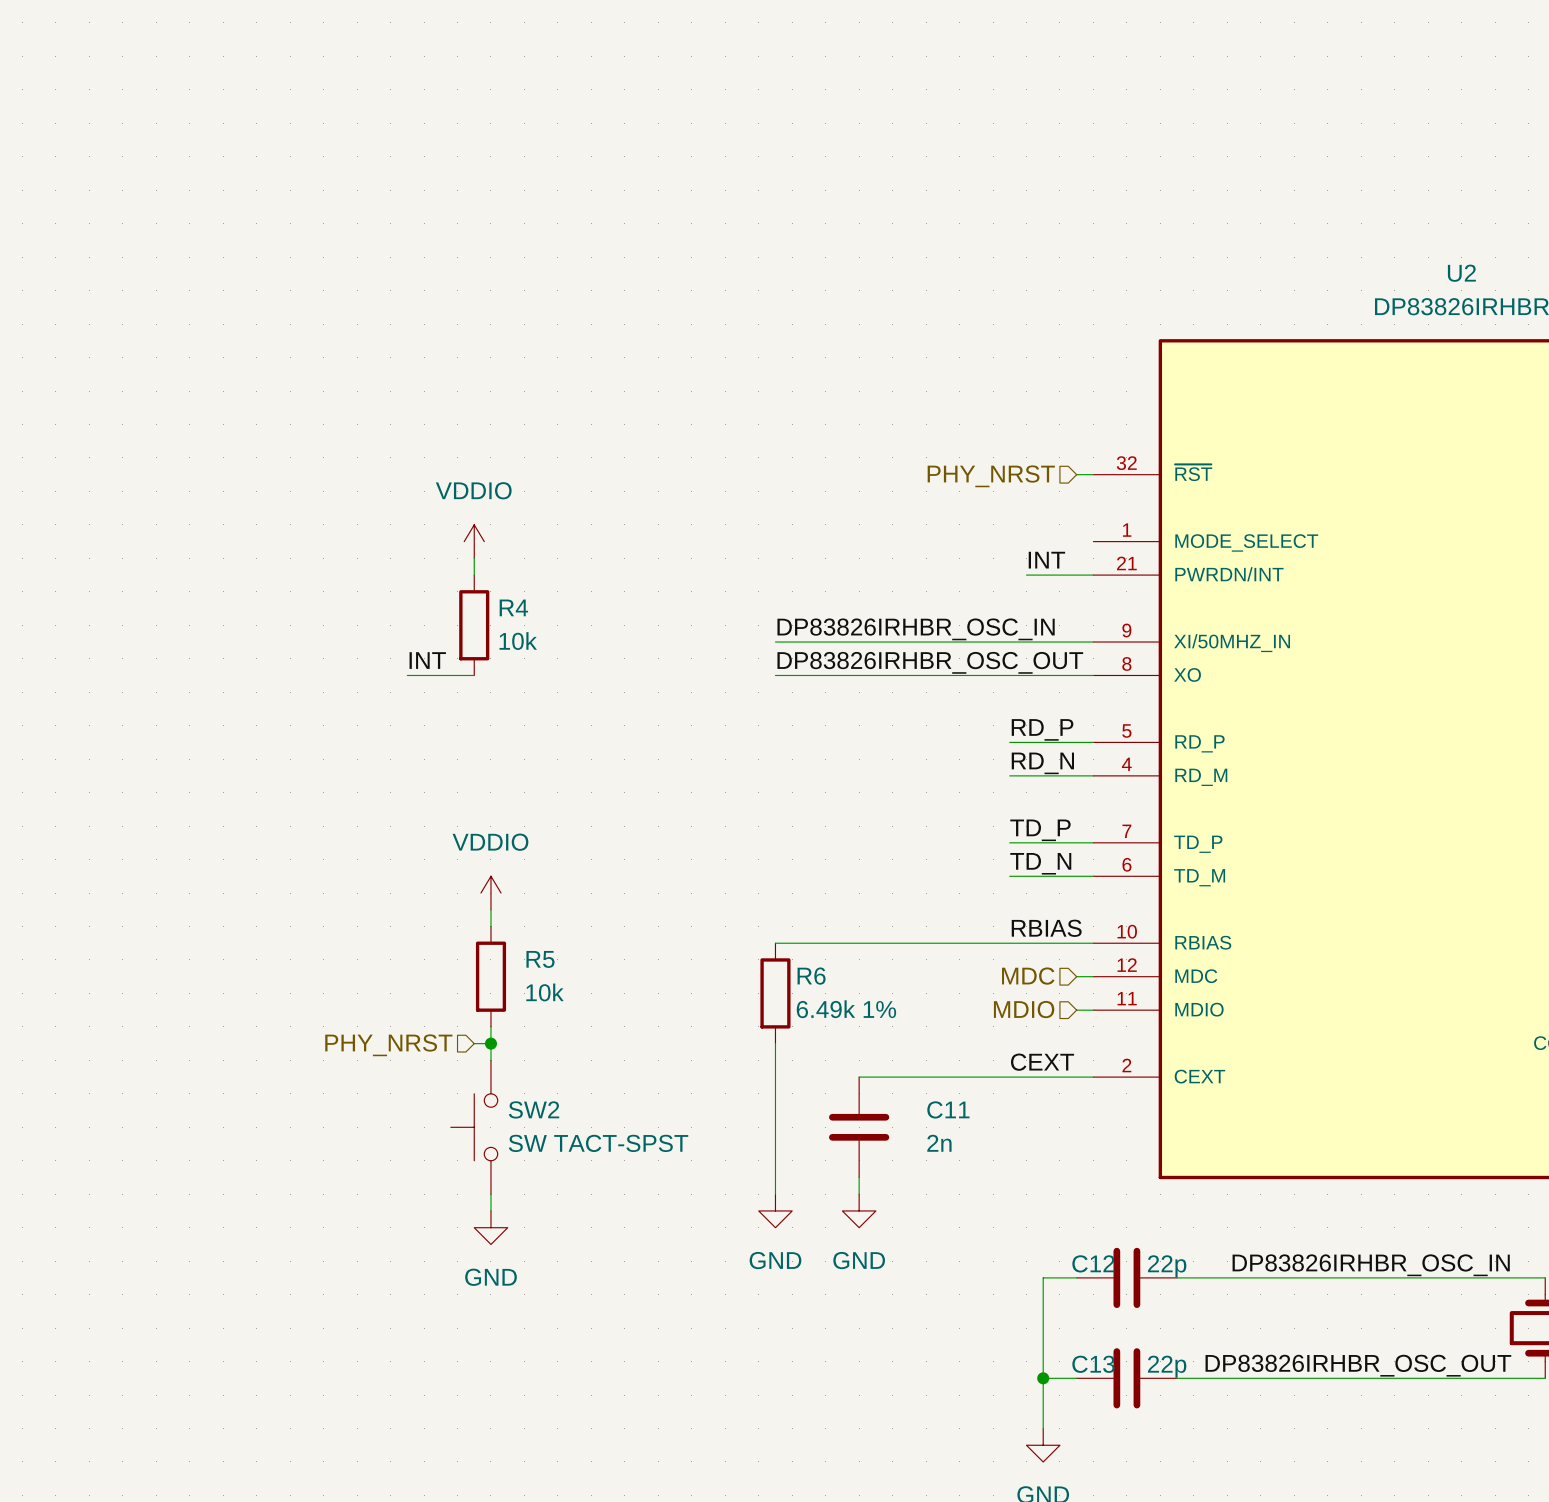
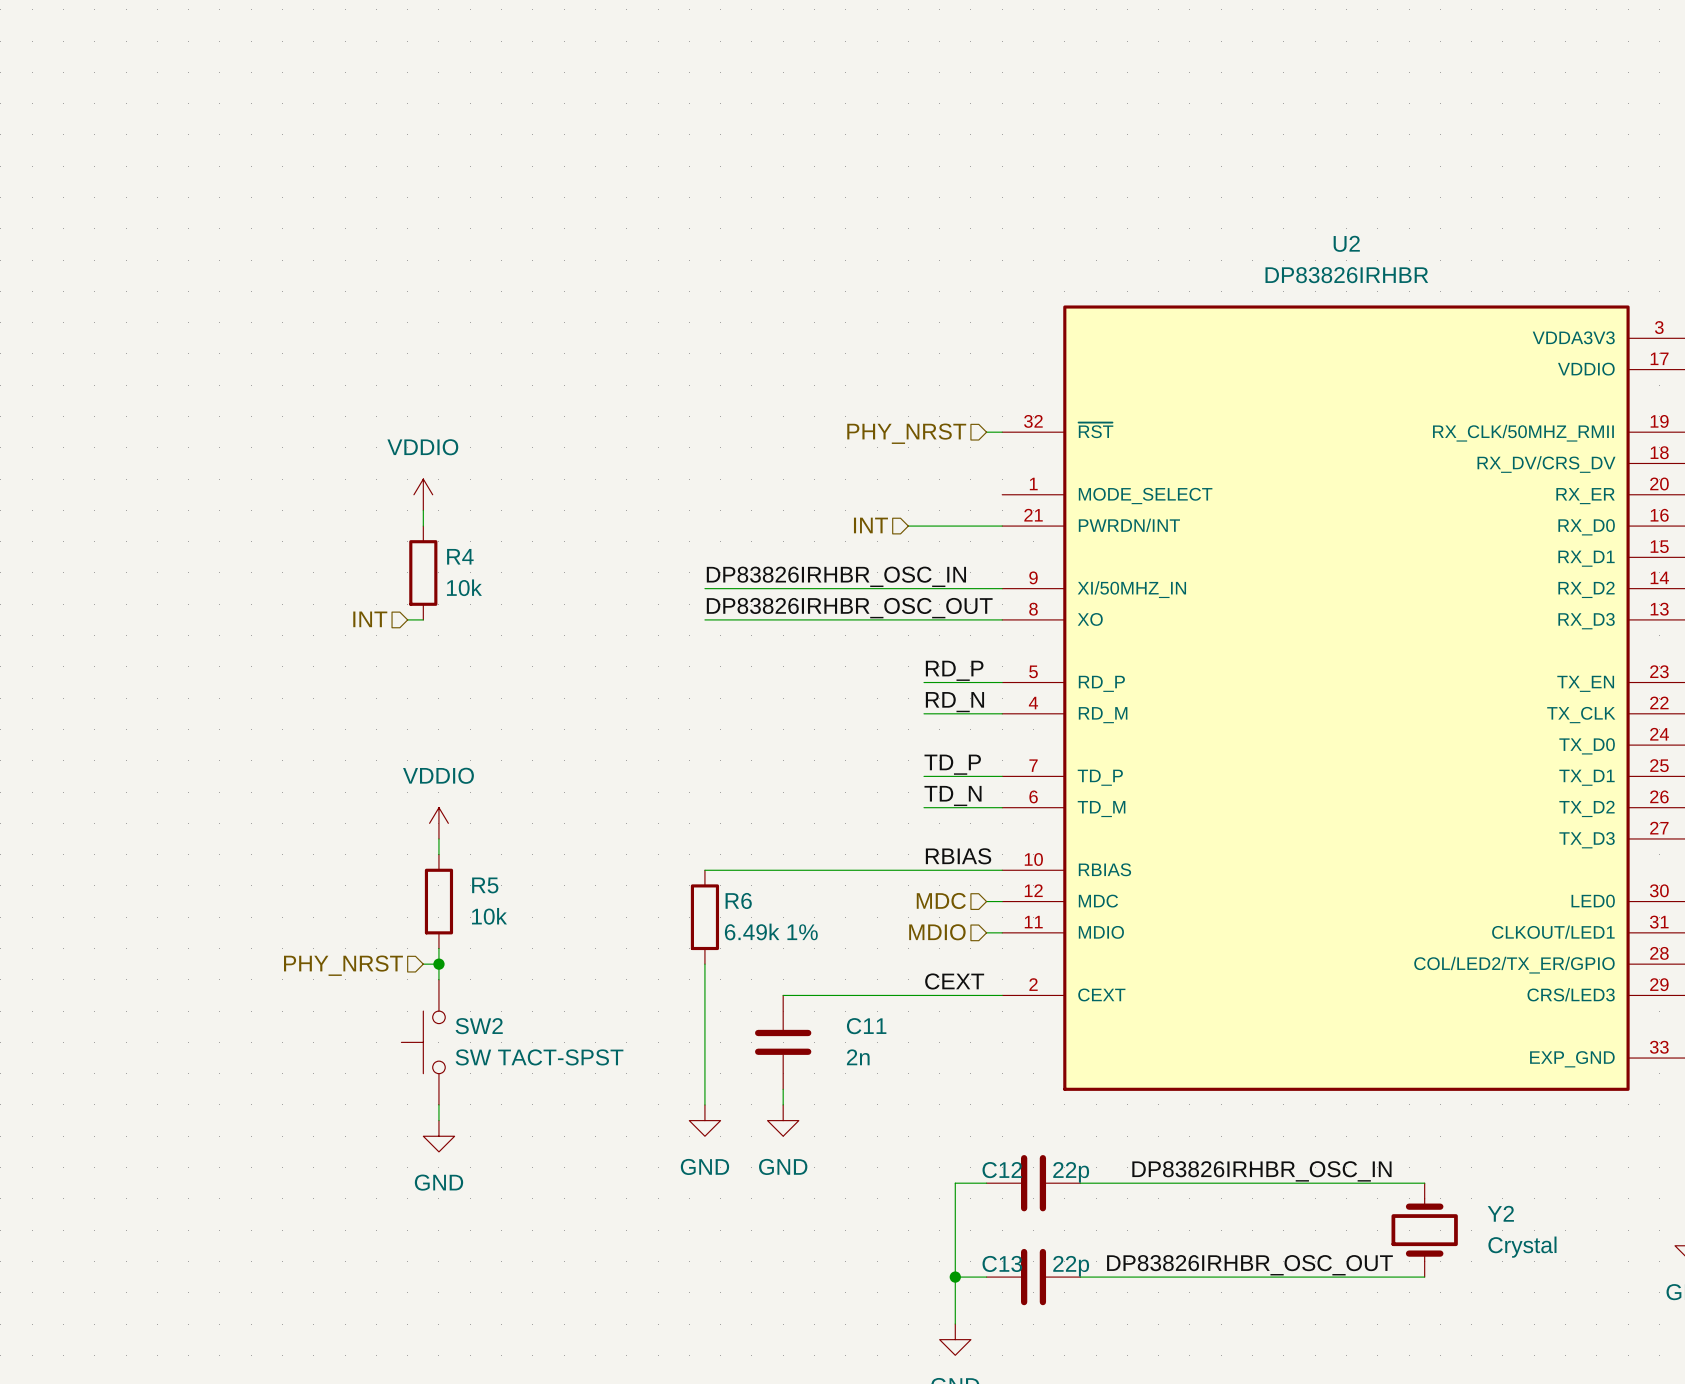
label: INT (1046, 560) -> none
hierarchical label: none -> INT (870, 525)
wire: none -> (908, 526) (939, 526)
label: INT (427, 660) -> none
hierarchical label: none -> INT (370, 619)
wire: (407, 675) (457, 675) -> none

